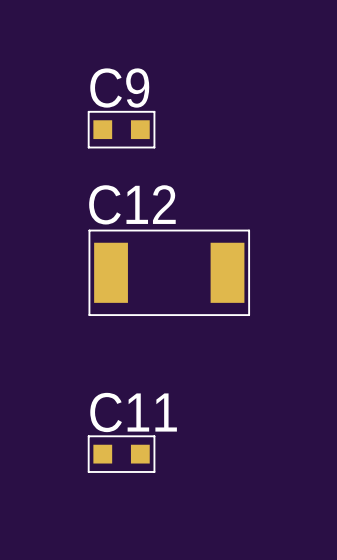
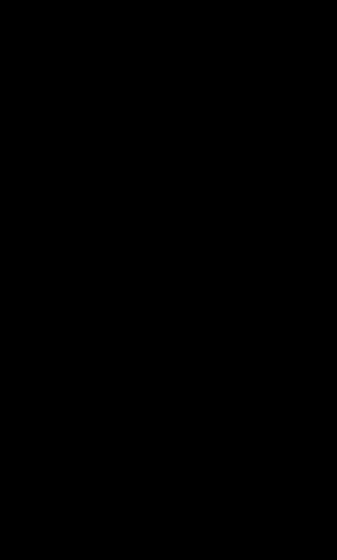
C9: (121, 129) -> none
C12: (169, 272) -> none
C11: (121, 454) -> none

